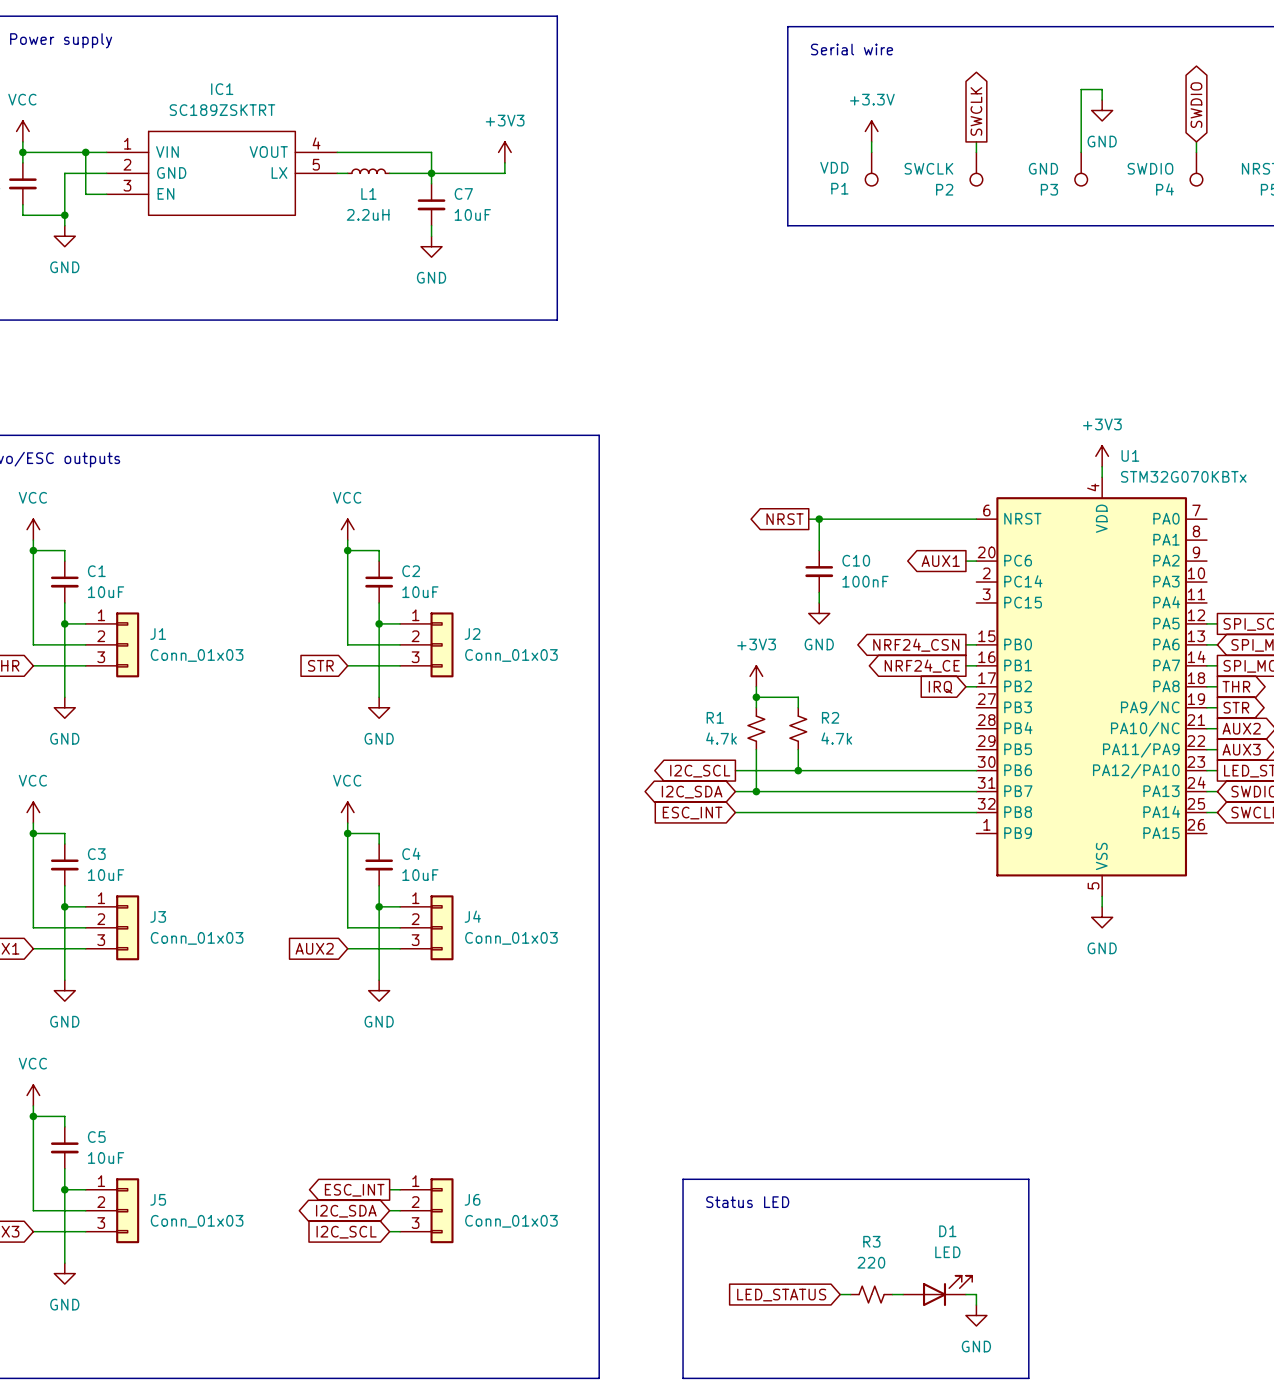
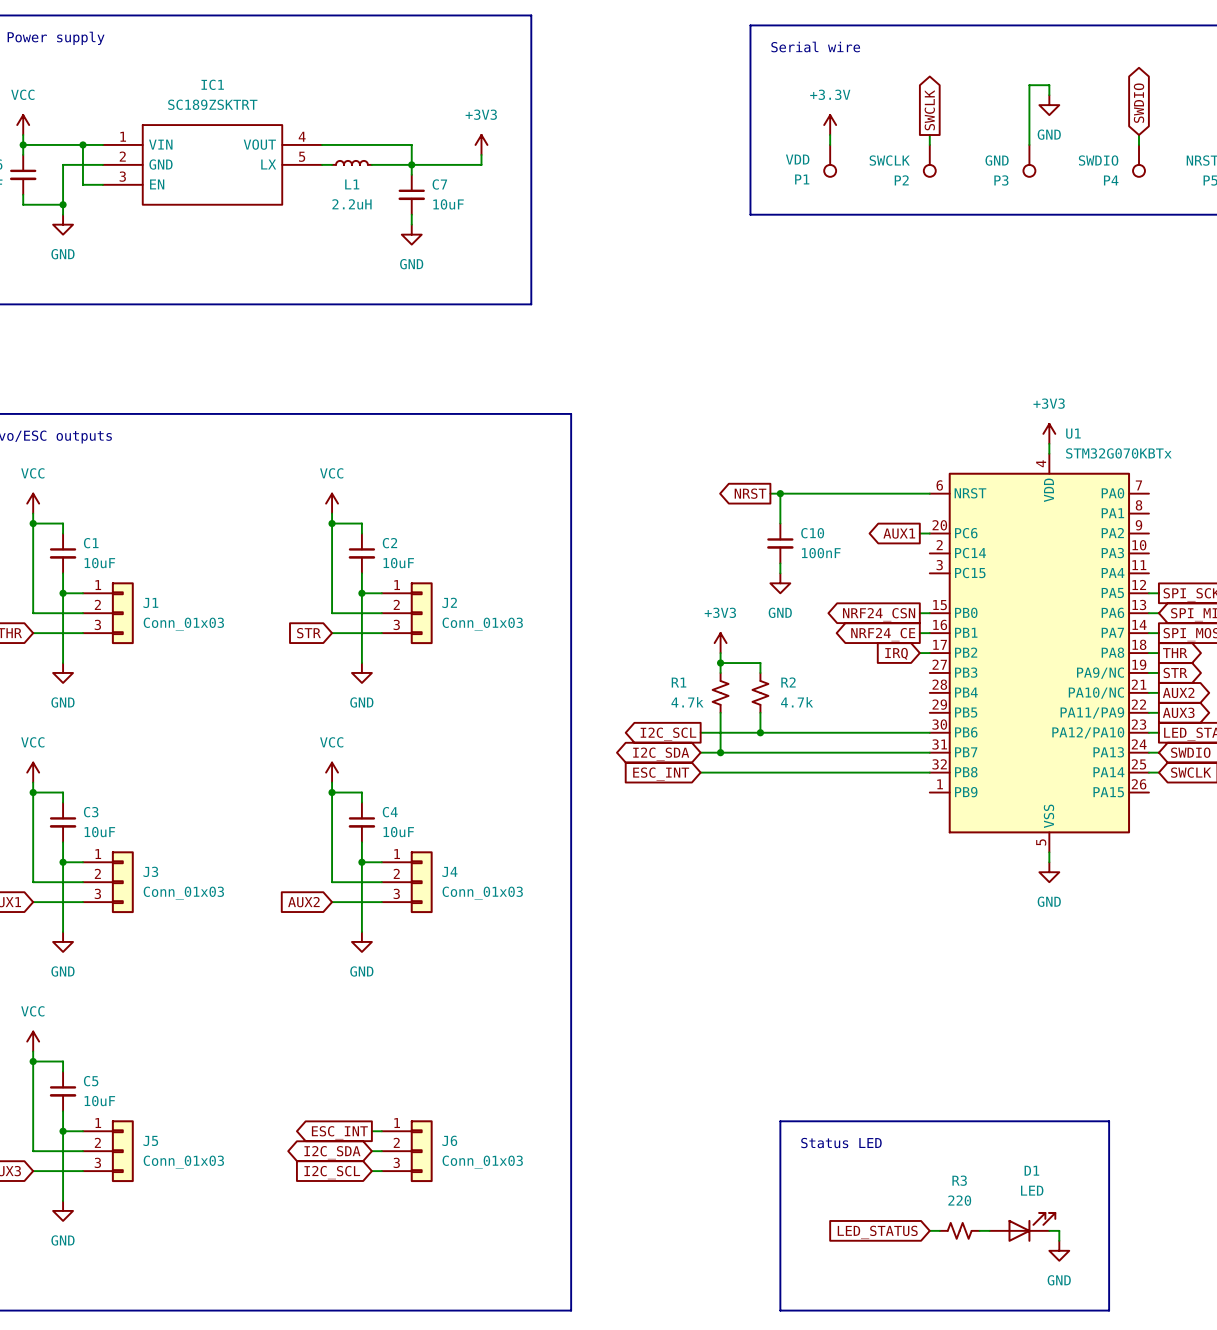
line: (819, 1179) (683, 1179) (683, 1378) (819, 1378) -> (780, 1121) (780, 1310)
line: (1028, 1179) (1028, 1378) -> (979, 1121) (1109, 1121) (1109, 1310) (979, 1310)
text position: Status LED (747, 1202) -> Status LED (841, 1143)
D1 position: (937, 1290) -> (1022, 1227)
wire: (840, 1294) (850, 1294) -> (979, 1230) (989, 1230)
R3 position: (871, 1294) -> (959, 1230)
wire: (892, 1294) (903, 1294) -> (929, 1230) (939, 1230)
wire: (965, 1294) (976, 1294) (976, 1305) -> (1049, 1230) (1059, 1230) (1059, 1240)
global label position: LED_STATUS (781, 1295) -> LED_STATUS (877, 1232)
power symbol position: GND (976, 1315) -> GND (1059, 1250)

